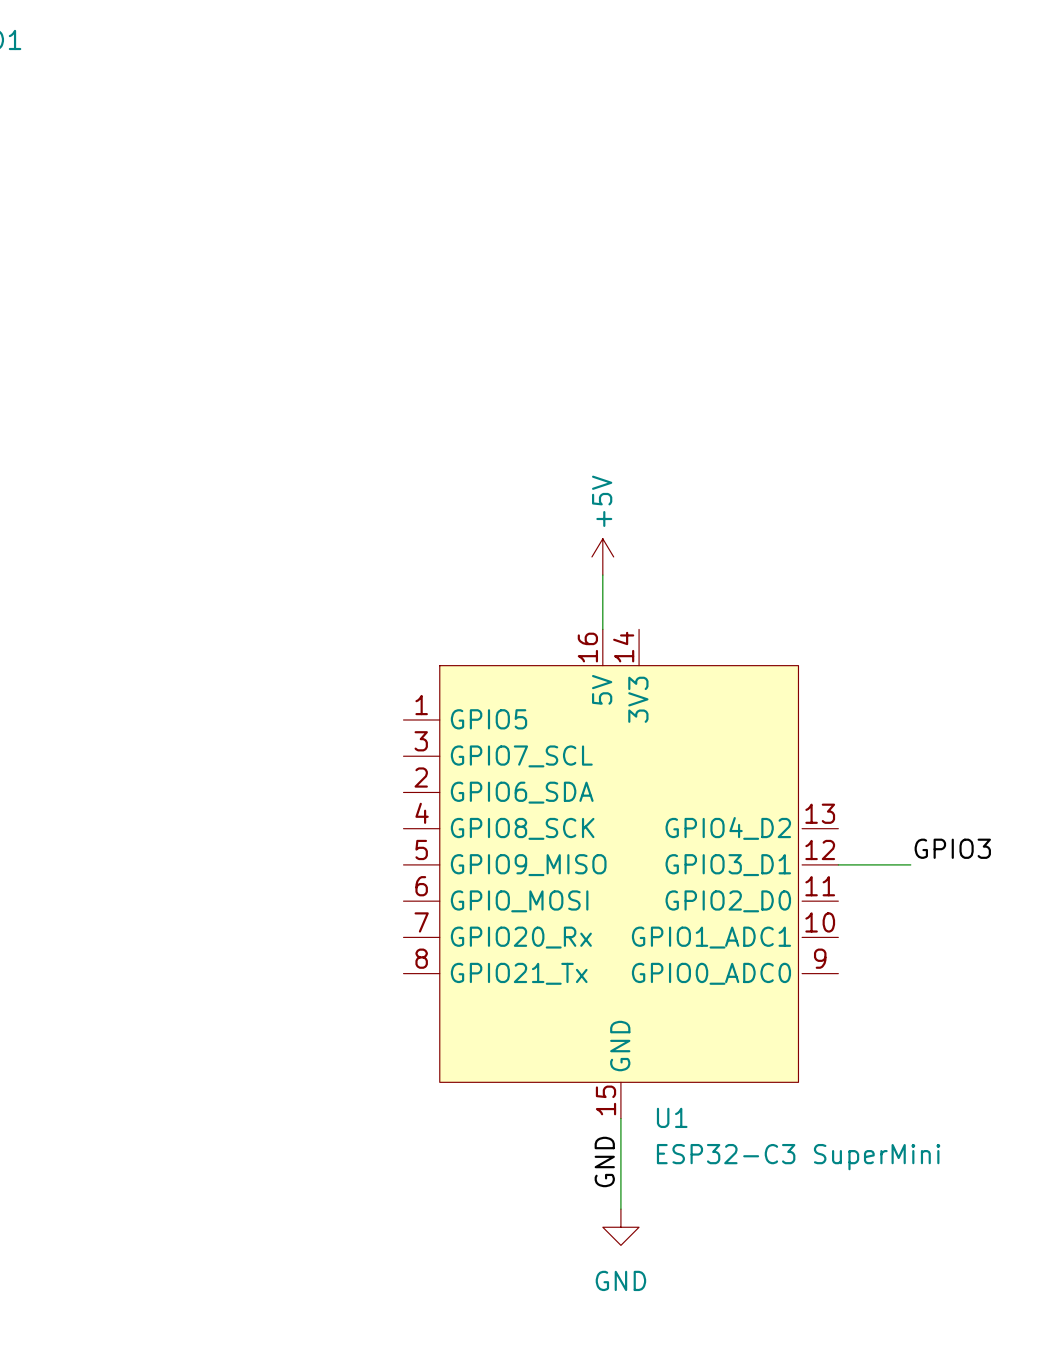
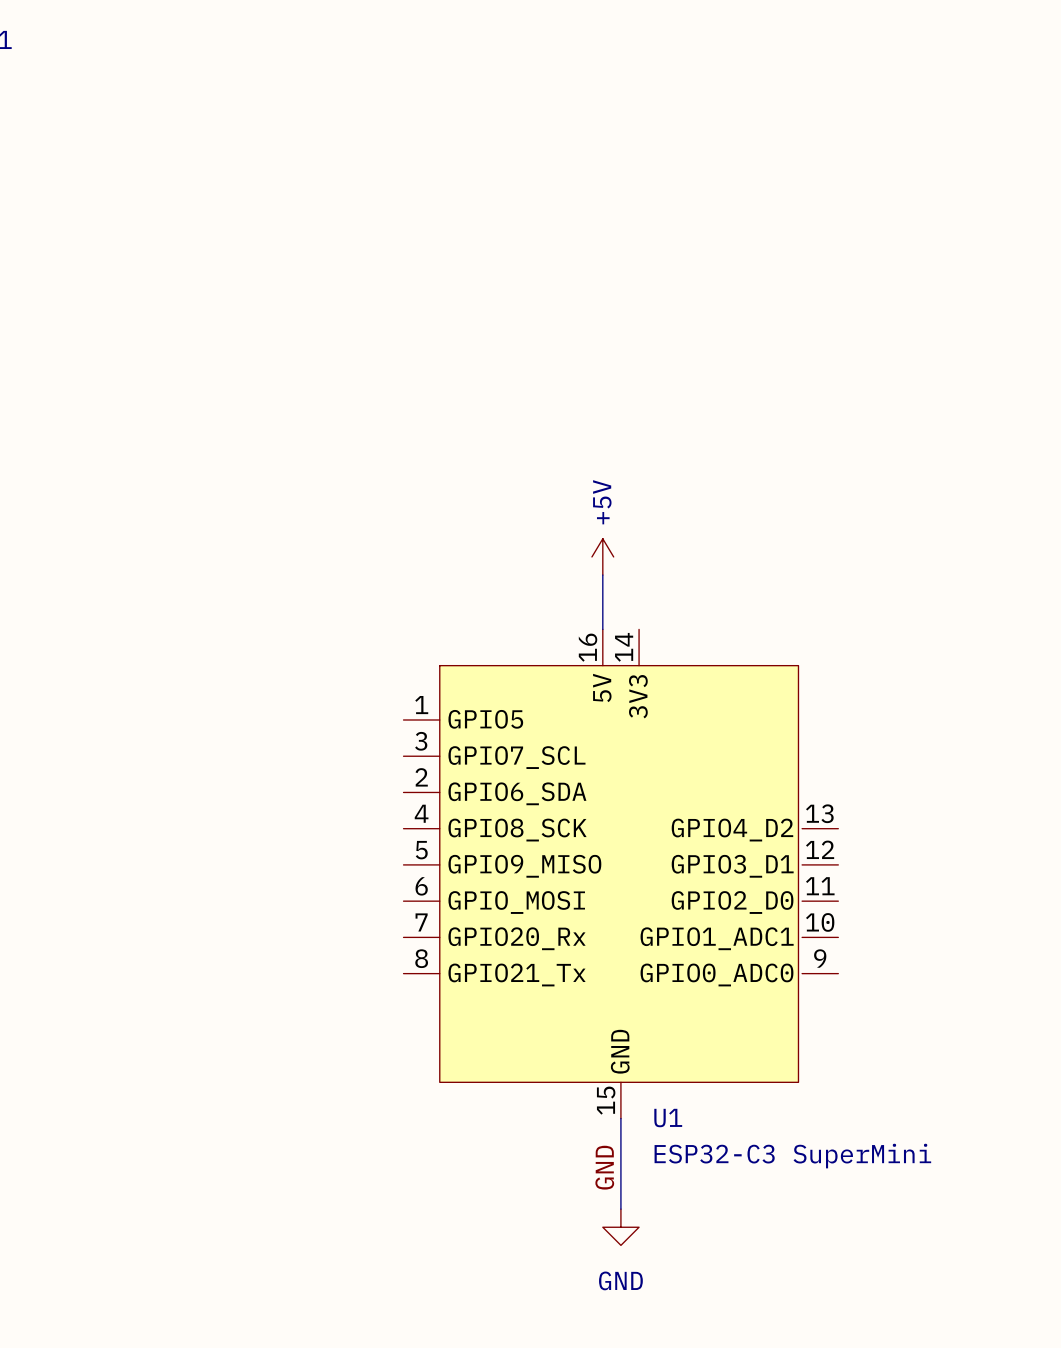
label: GPIO3 (952, 848) -> none
wire: (838, 864) (910, 864) -> none

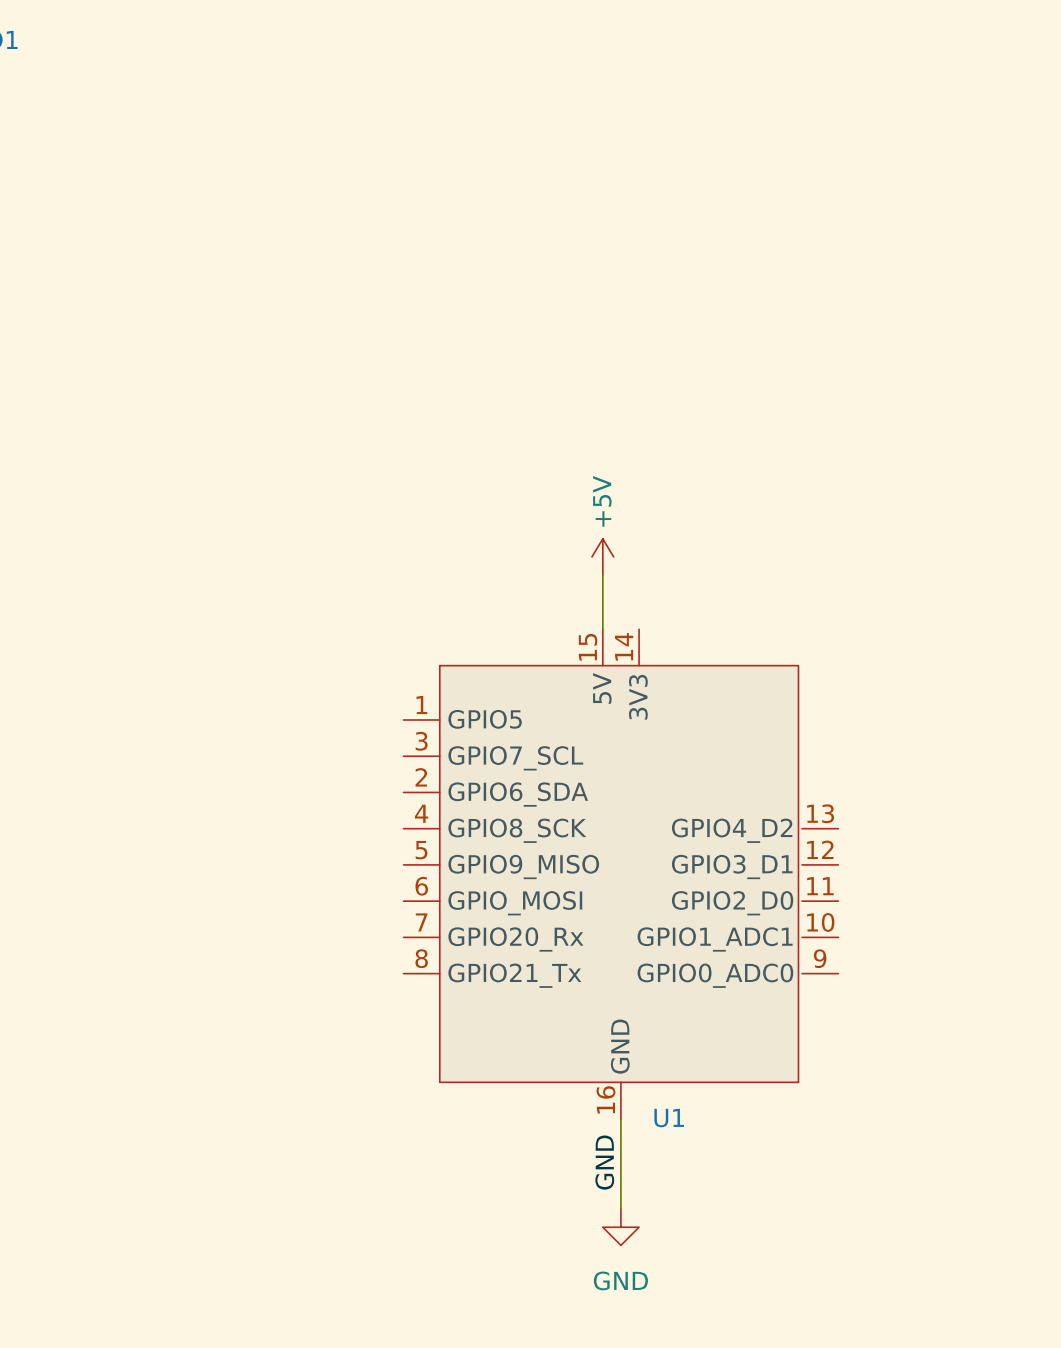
U1 pin number: 16 (588, 647) -> 15 (588, 647)
U1 pin number: 15 (606, 1100) -> 16 (606, 1099)
U1 value: ESP32-C3 SuperMini (792, 1156) -> none

